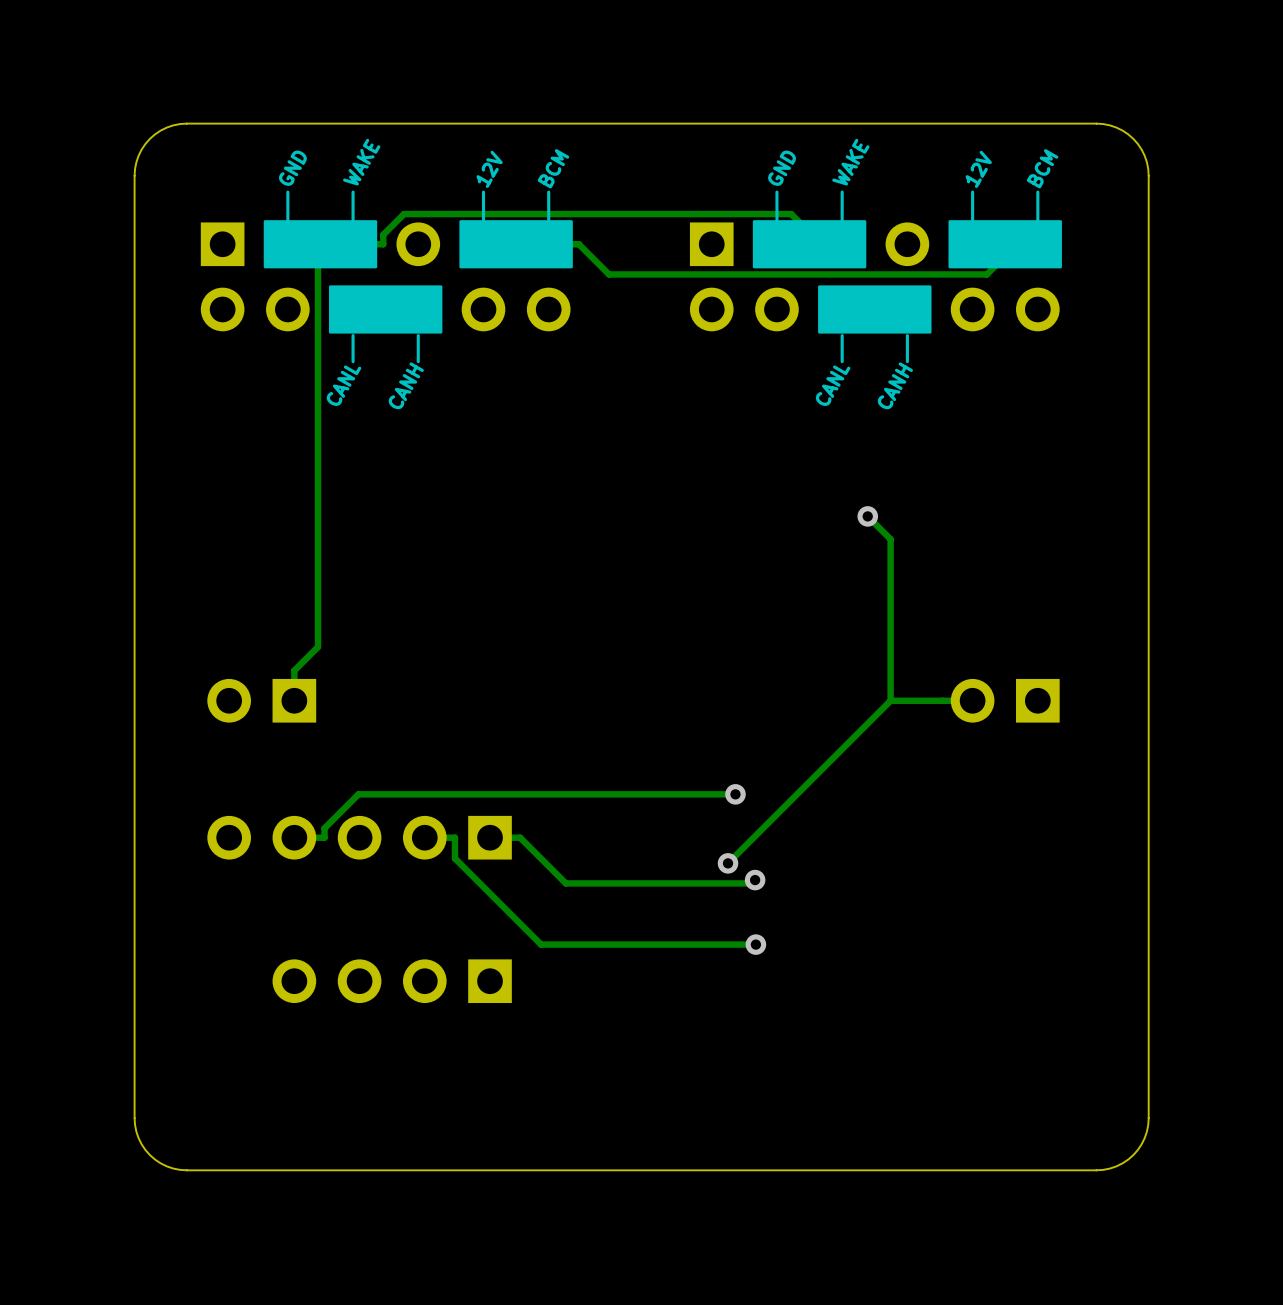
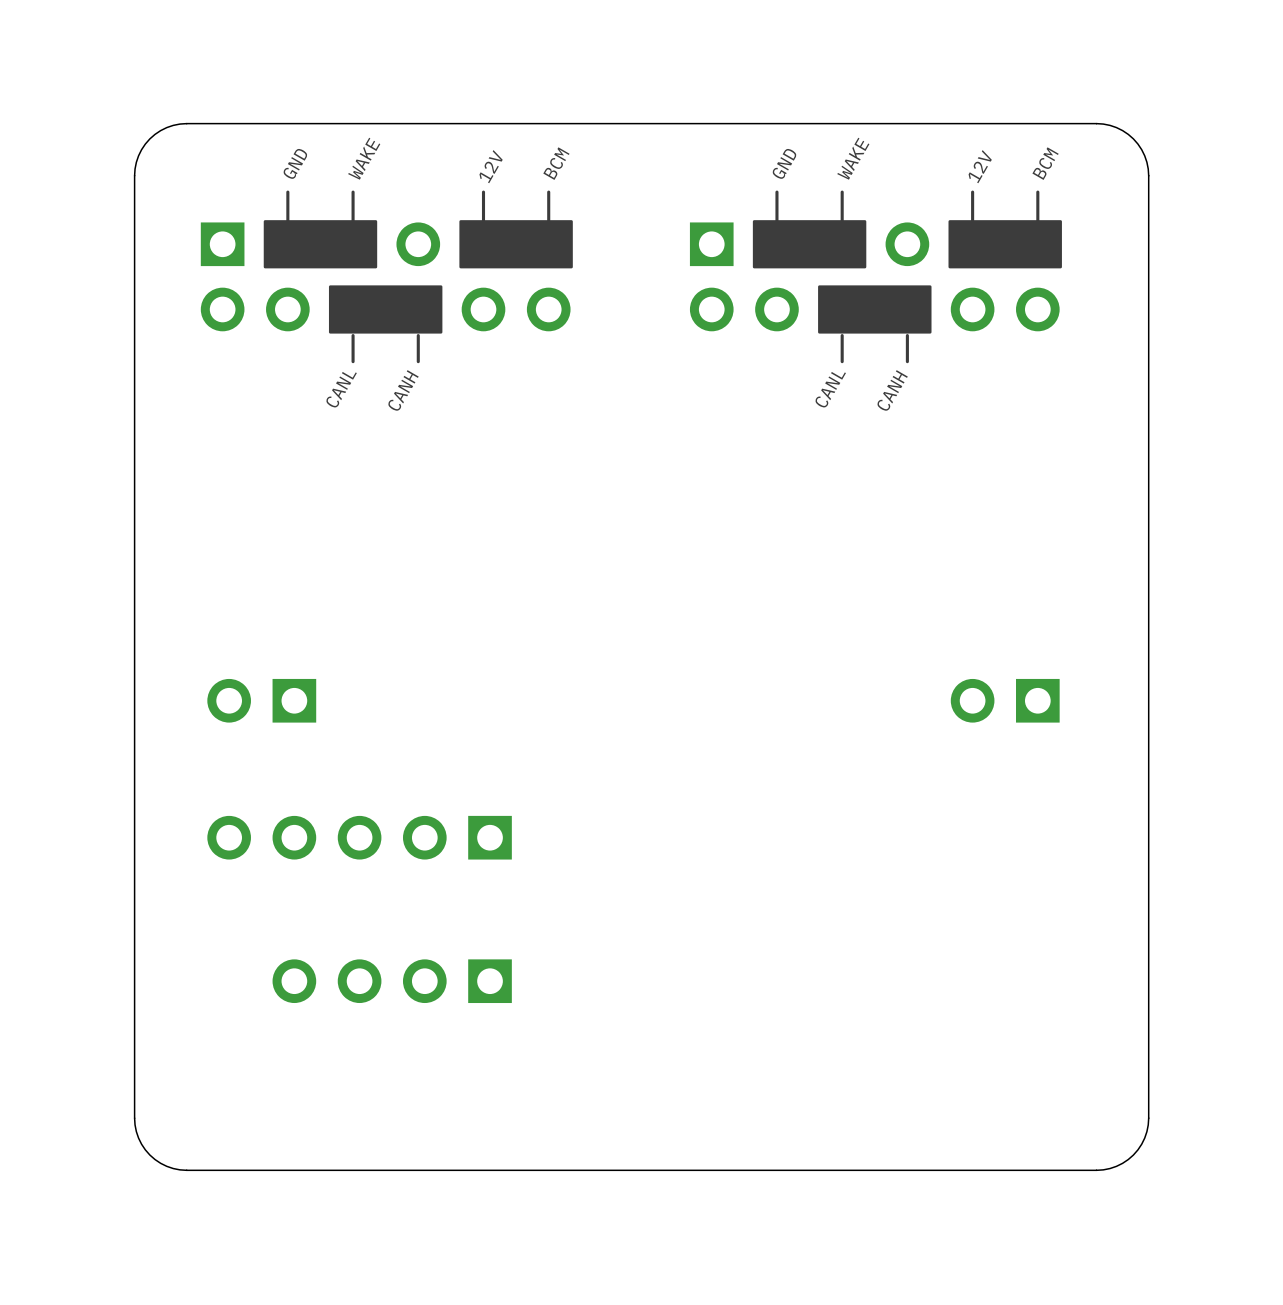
track: (287, 244) (318, 244) (318, 646) (294, 670) (294, 700) -> none
track: (842, 244) (812, 244) (812, 234) (791, 214) (403, 214) (383, 234) (383, 244) (353, 244) -> none
track: (1037, 244) (1007, 244) (1007, 253) (986, 274) (609, 274) (578, 244) (548, 244) -> none
track: (867, 516) (890, 539) (890, 700) -> none
via: (867, 516) -> none
track: (890, 700) (728, 863) -> none
track: (972, 700) (890, 700) -> none
track: (735, 794) (358, 794) (324, 828) (324, 837) (294, 837) -> none
via: (735, 794) -> none
track: (424, 837) (454, 837) (454, 858) (541, 944) (755, 944) -> none
track: (490, 837) (520, 837) (565, 883) (751, 883) (755, 880) -> none
via: (728, 863) -> none
via: (755, 880) -> none
via: (755, 944) -> none

